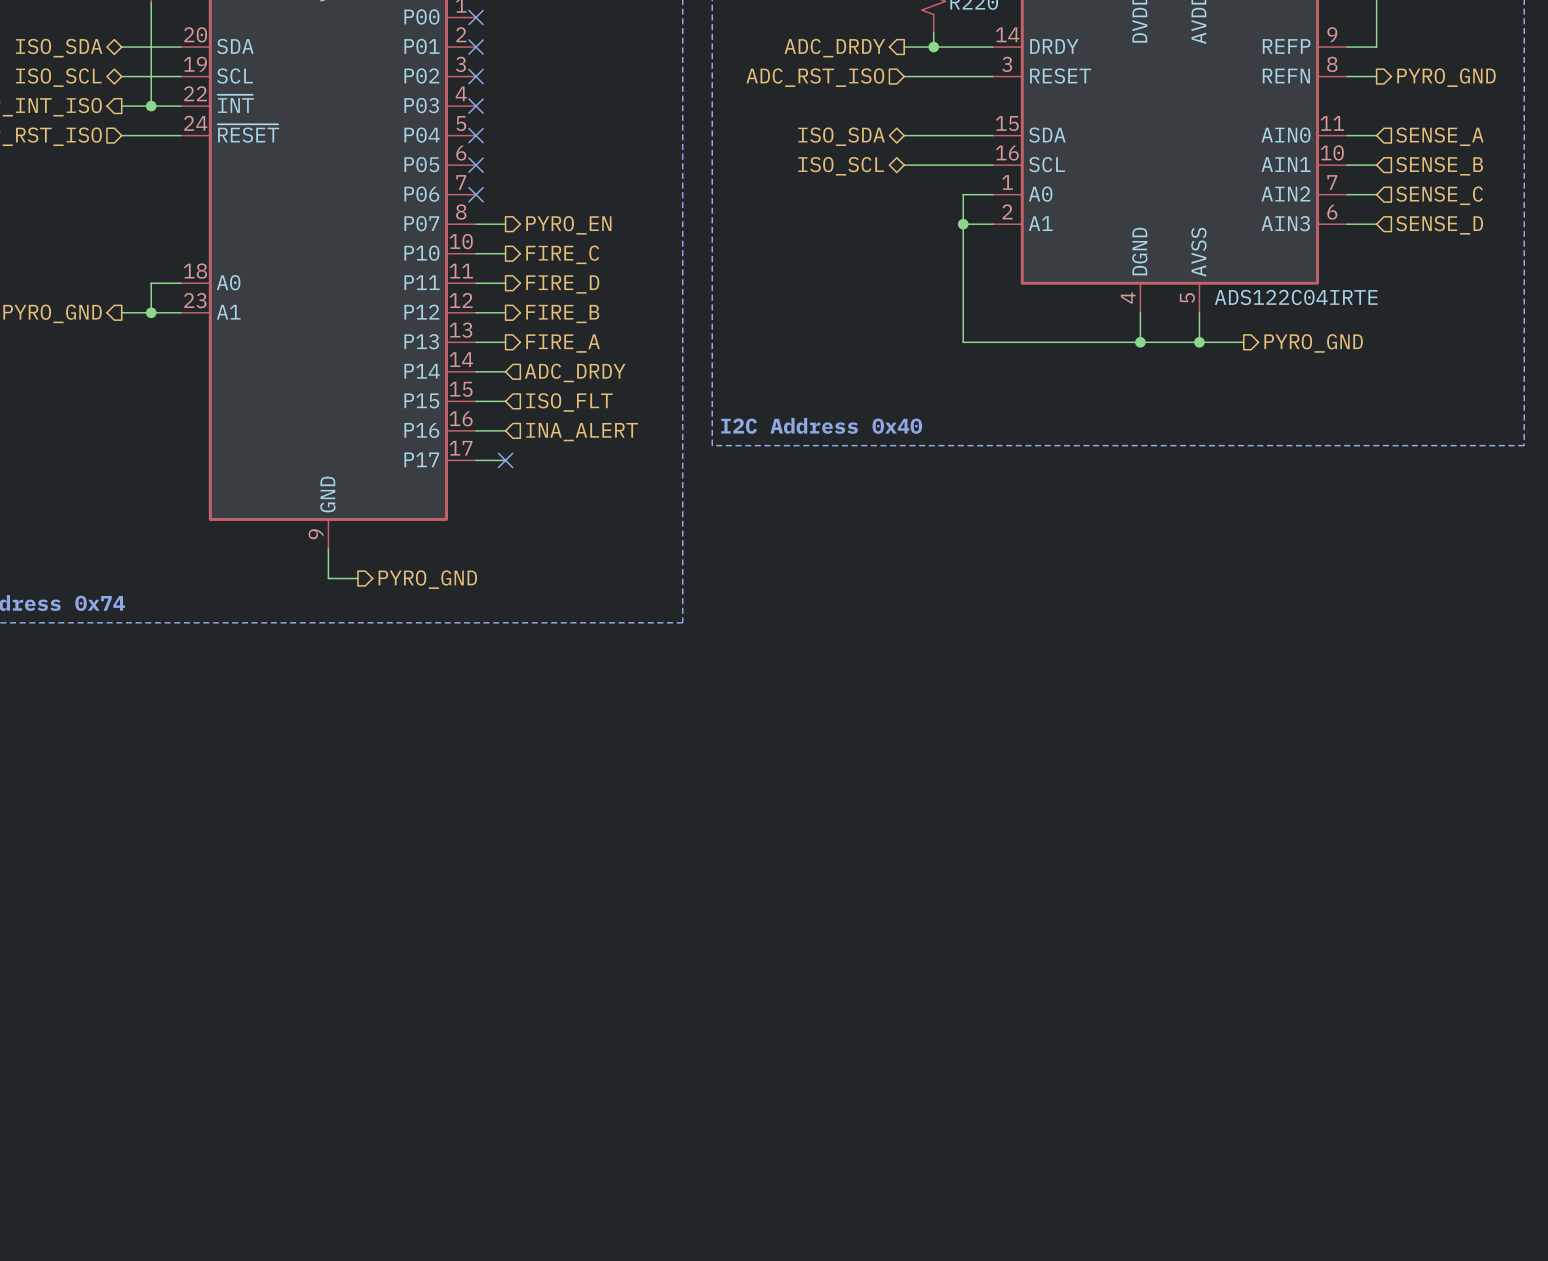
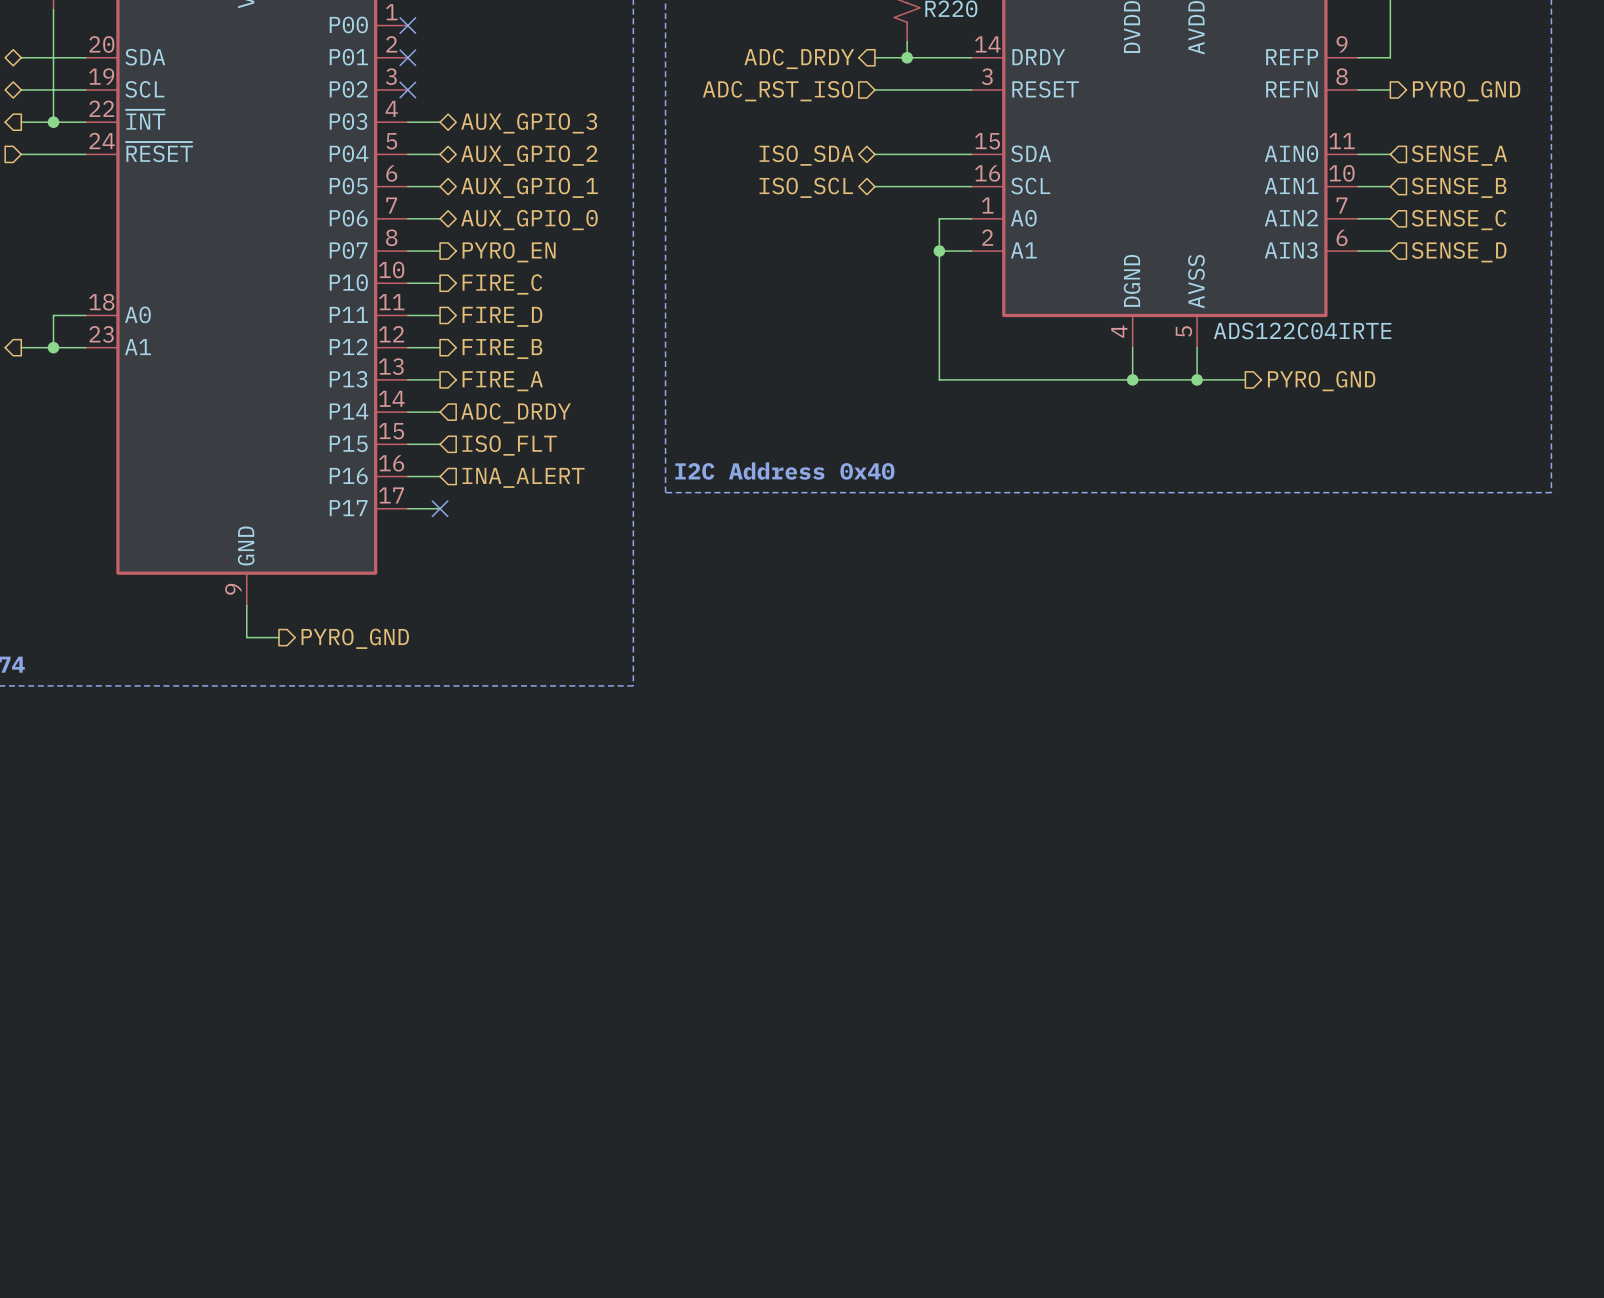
wire: none -> (407, 122) (440, 122)
no-connect mark: (476, 106) -> none
hierarchical label: none -> AUX_GPIO_3 (529, 123)
wire: none -> (407, 154) (440, 154)
no-connect mark: (476, 135) -> none
hierarchical label: none -> AUX_GPIO_2 (529, 155)
wire: none -> (407, 186) (440, 186)
no-connect mark: (476, 165) -> none
hierarchical label: none -> AUX_GPIO_1 (529, 187)
wire: none -> (407, 218) (440, 218)
no-connect mark: (476, 194) -> none
hierarchical label: none -> AUX_GPIO_0 (529, 220)

